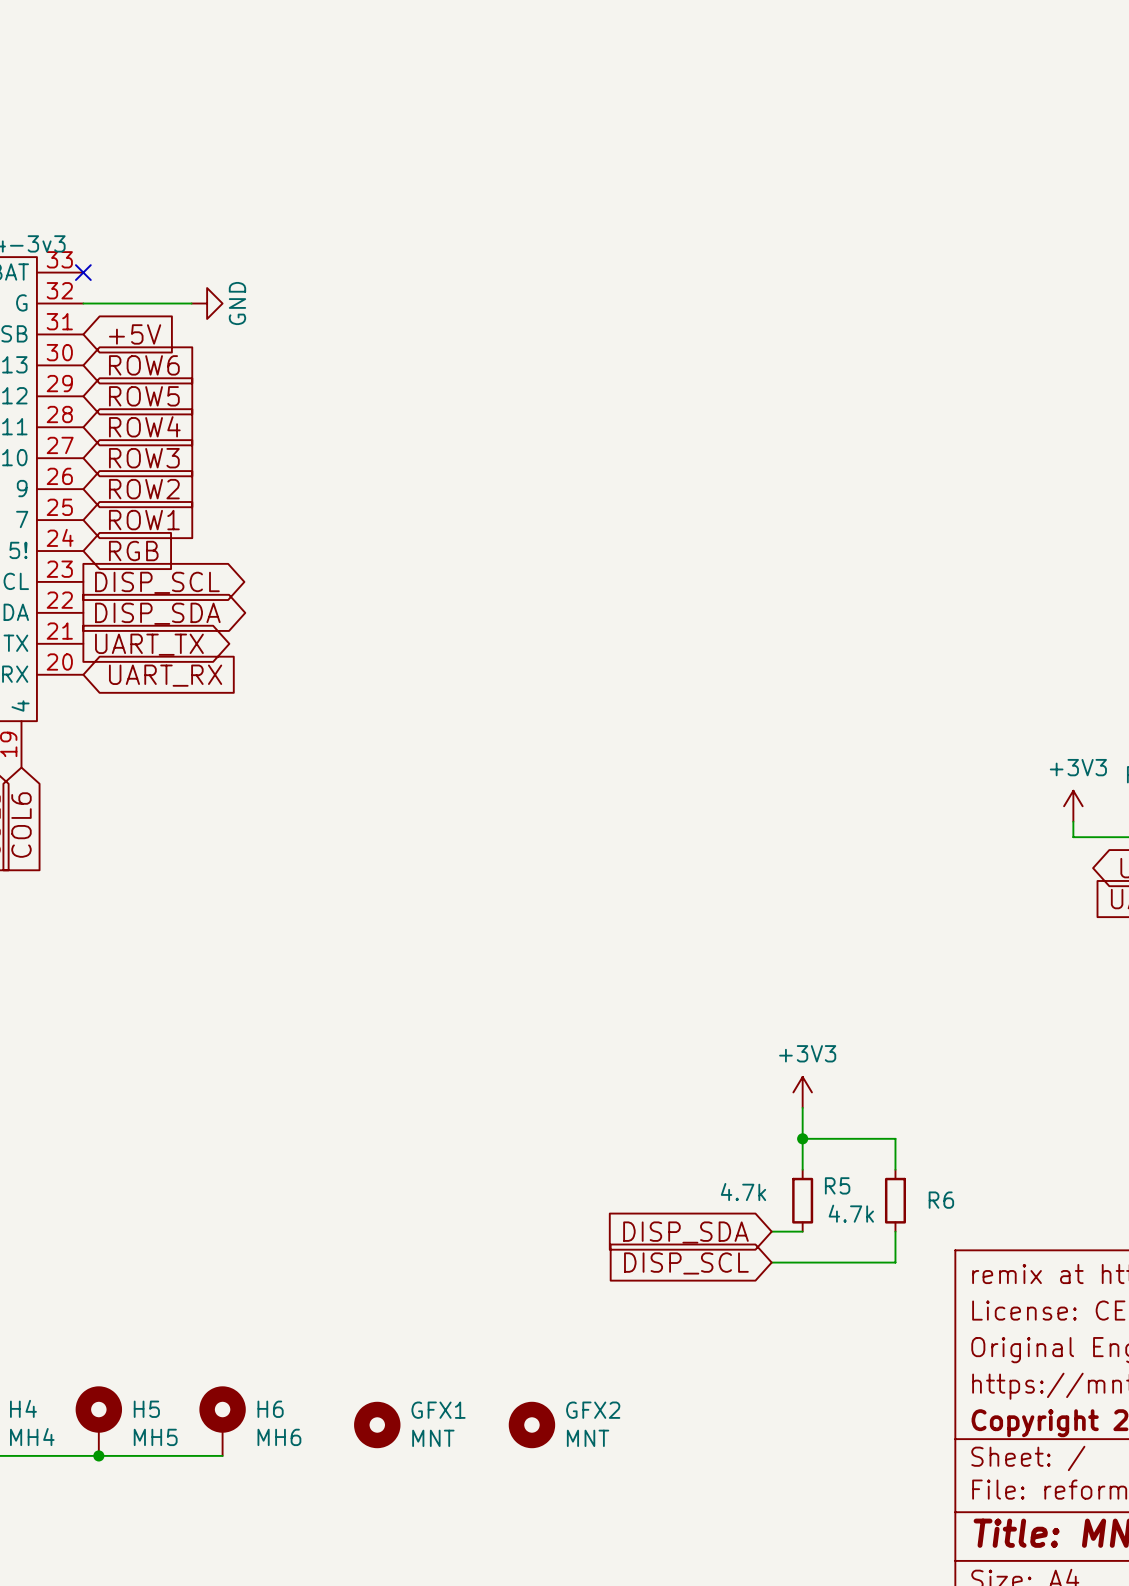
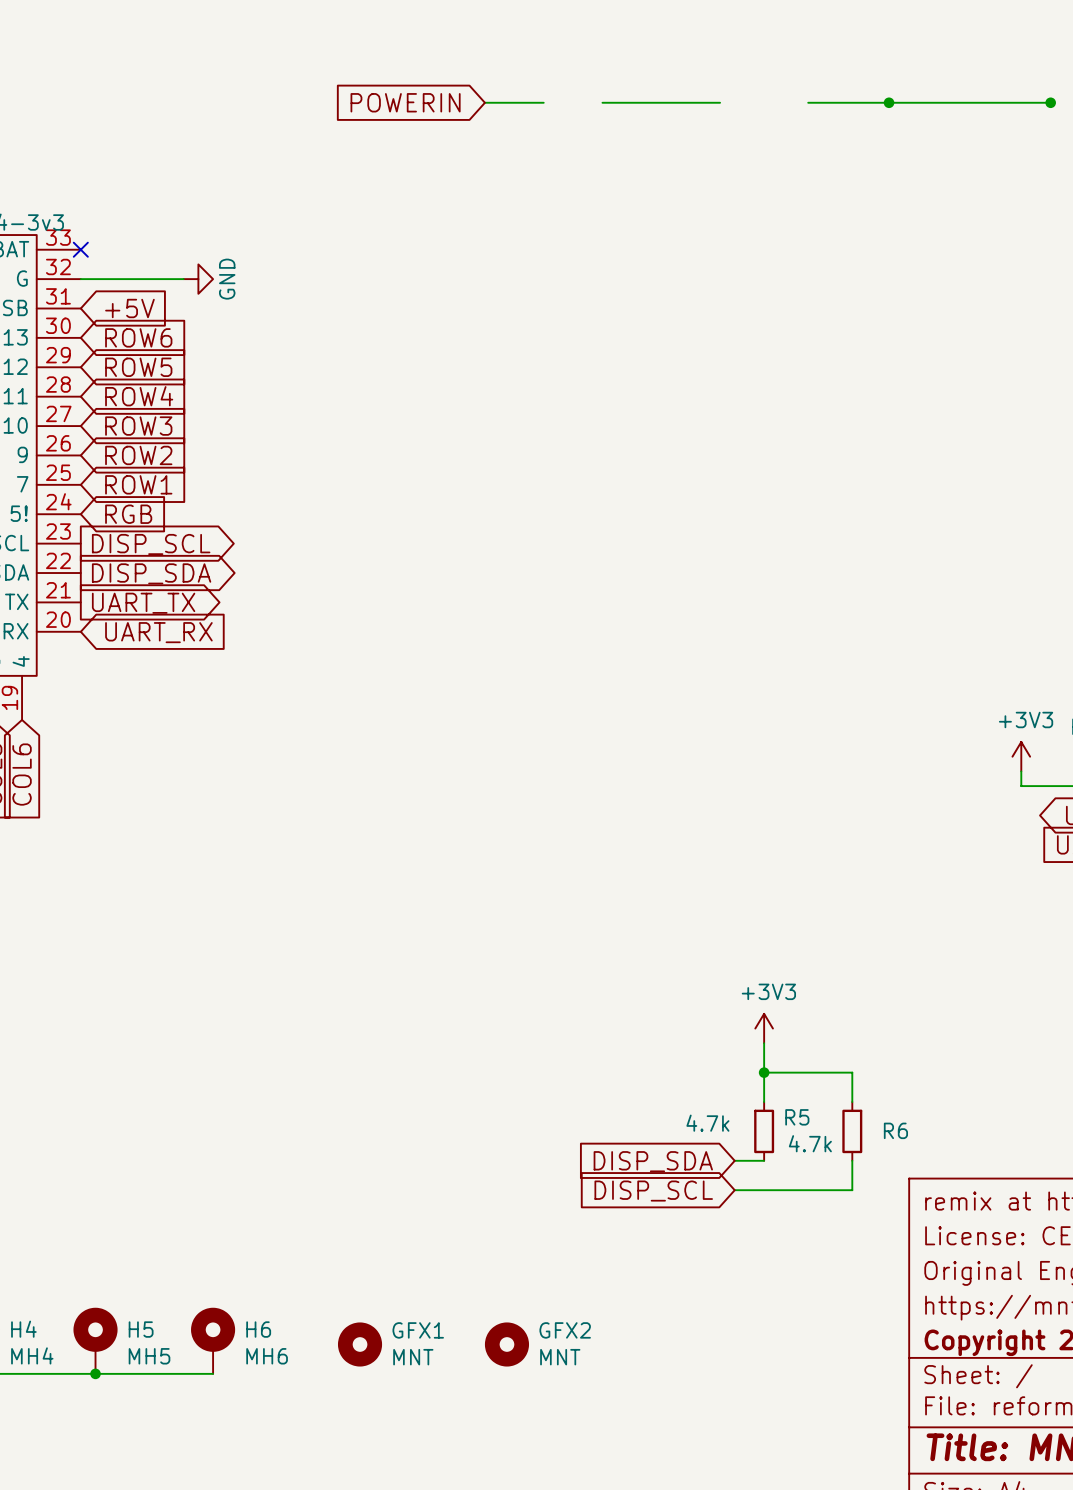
global label: none -> POWERIN (405, 102)
wire: none -> (484, 102) (543, 102)
wire: none -> (602, 102) (720, 102)
wire: none -> (808, 102) (1050, 102)
junction: none -> (889, 102)
junction: none -> (1050, 102)

